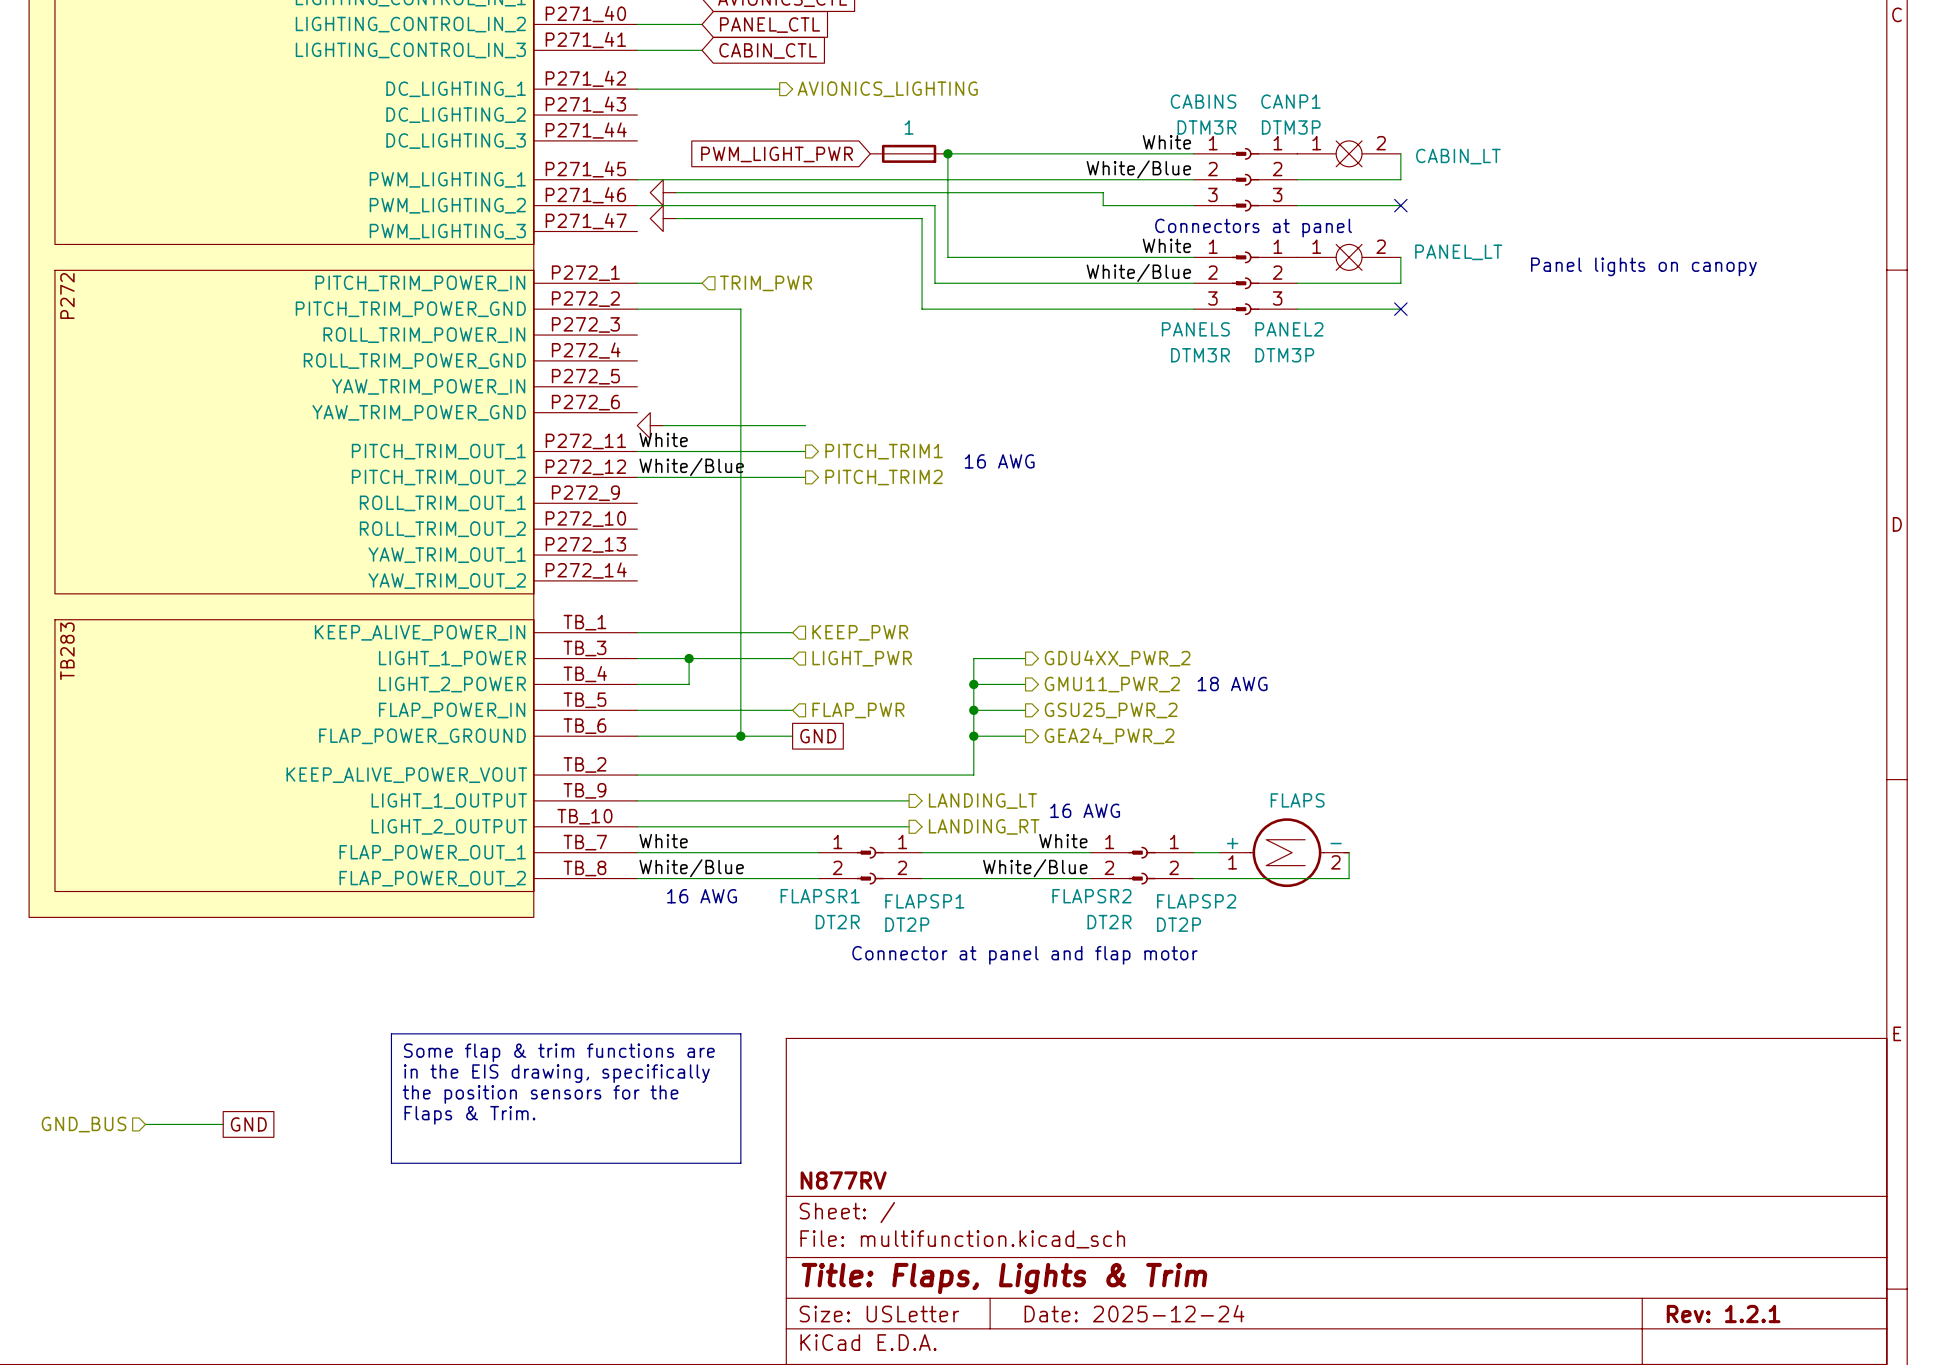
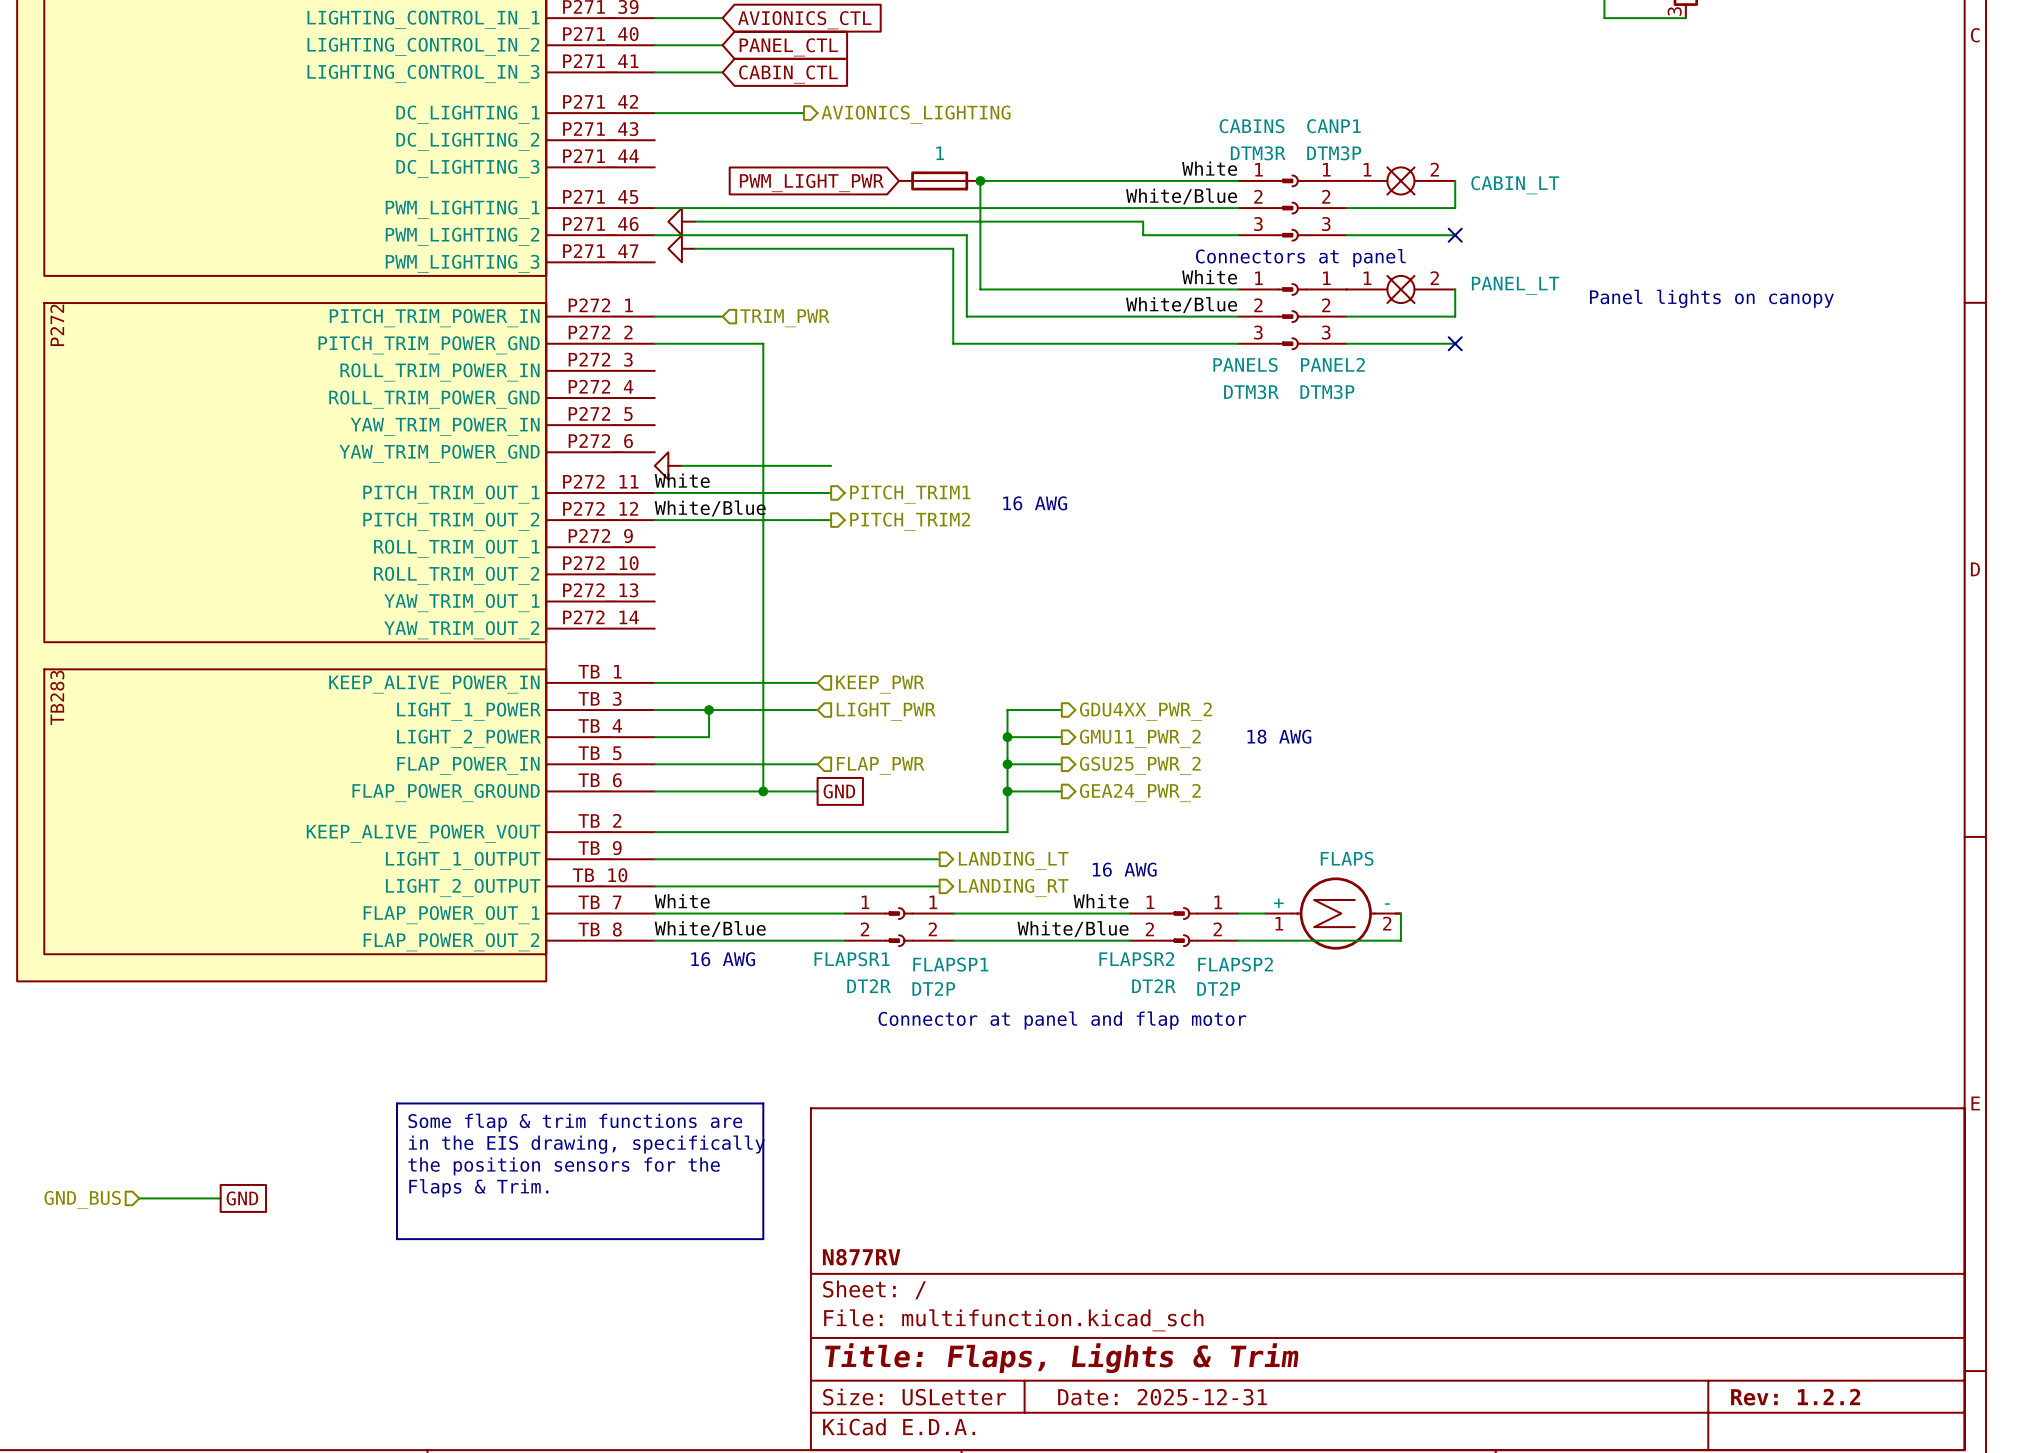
title block: Date: 2025-12-24 (1134, 1313) -> Date: 2025-12-31 (1162, 1397)
title block: Rev: 1.2.1 (1723, 1314) -> Rev: 1.2.2 (1795, 1397)

